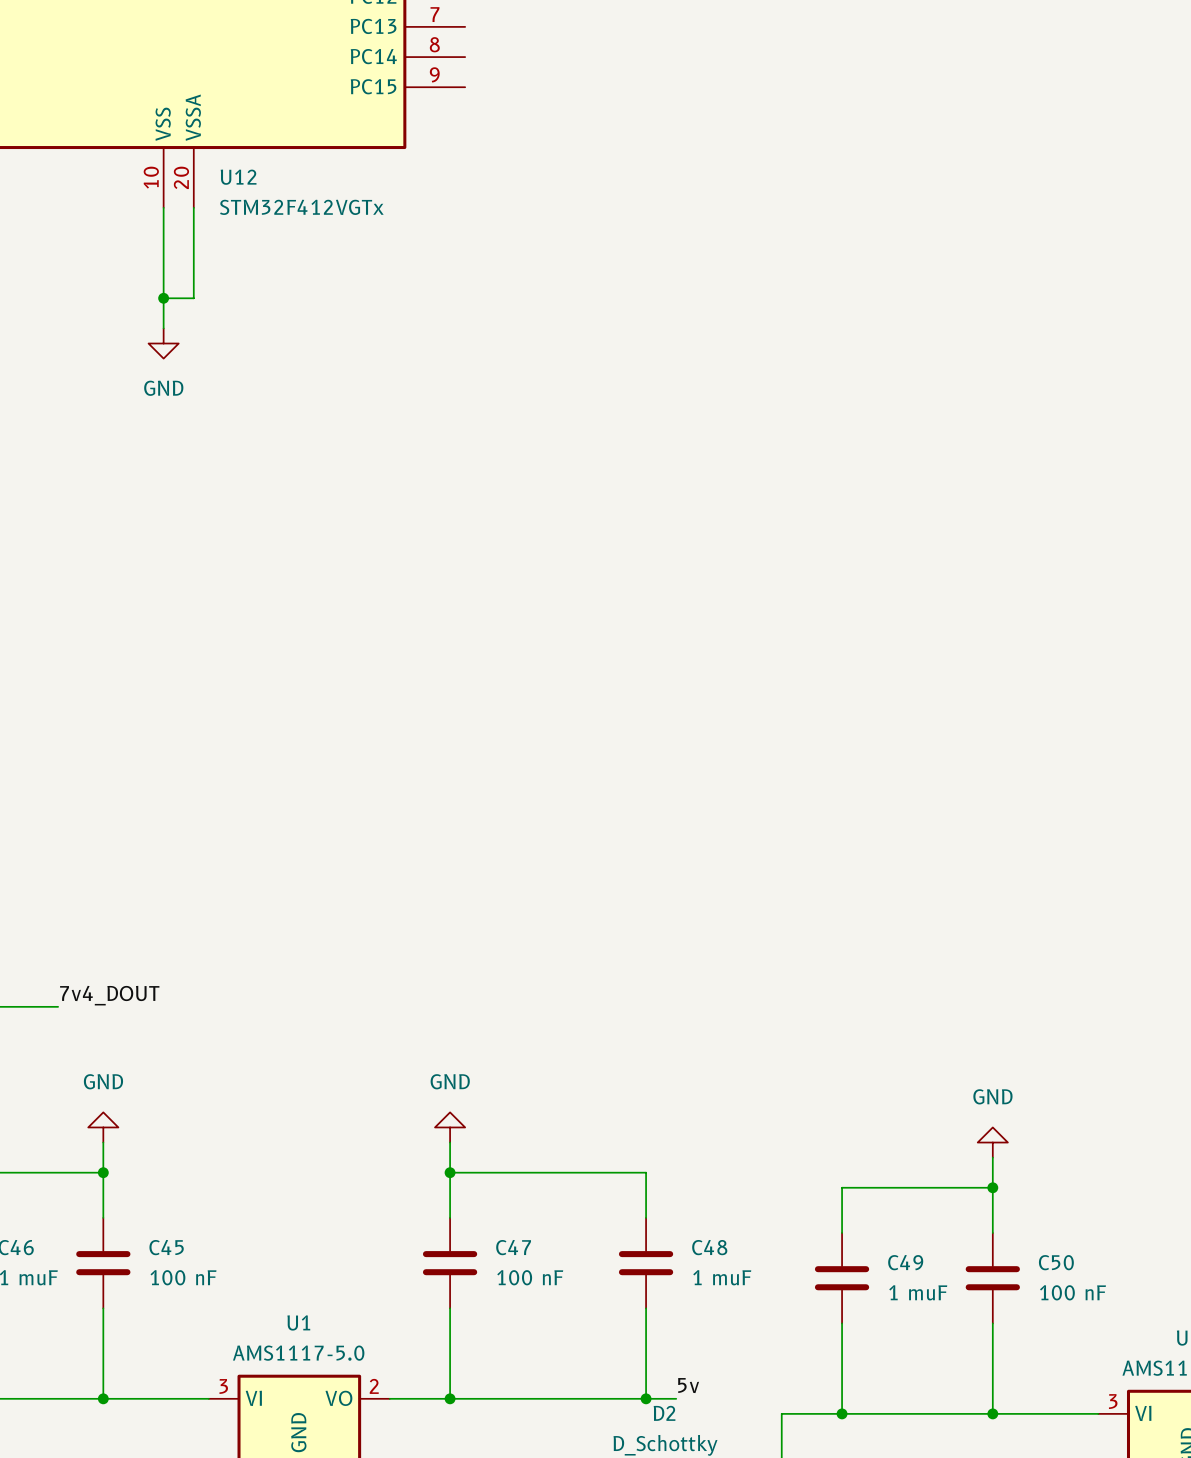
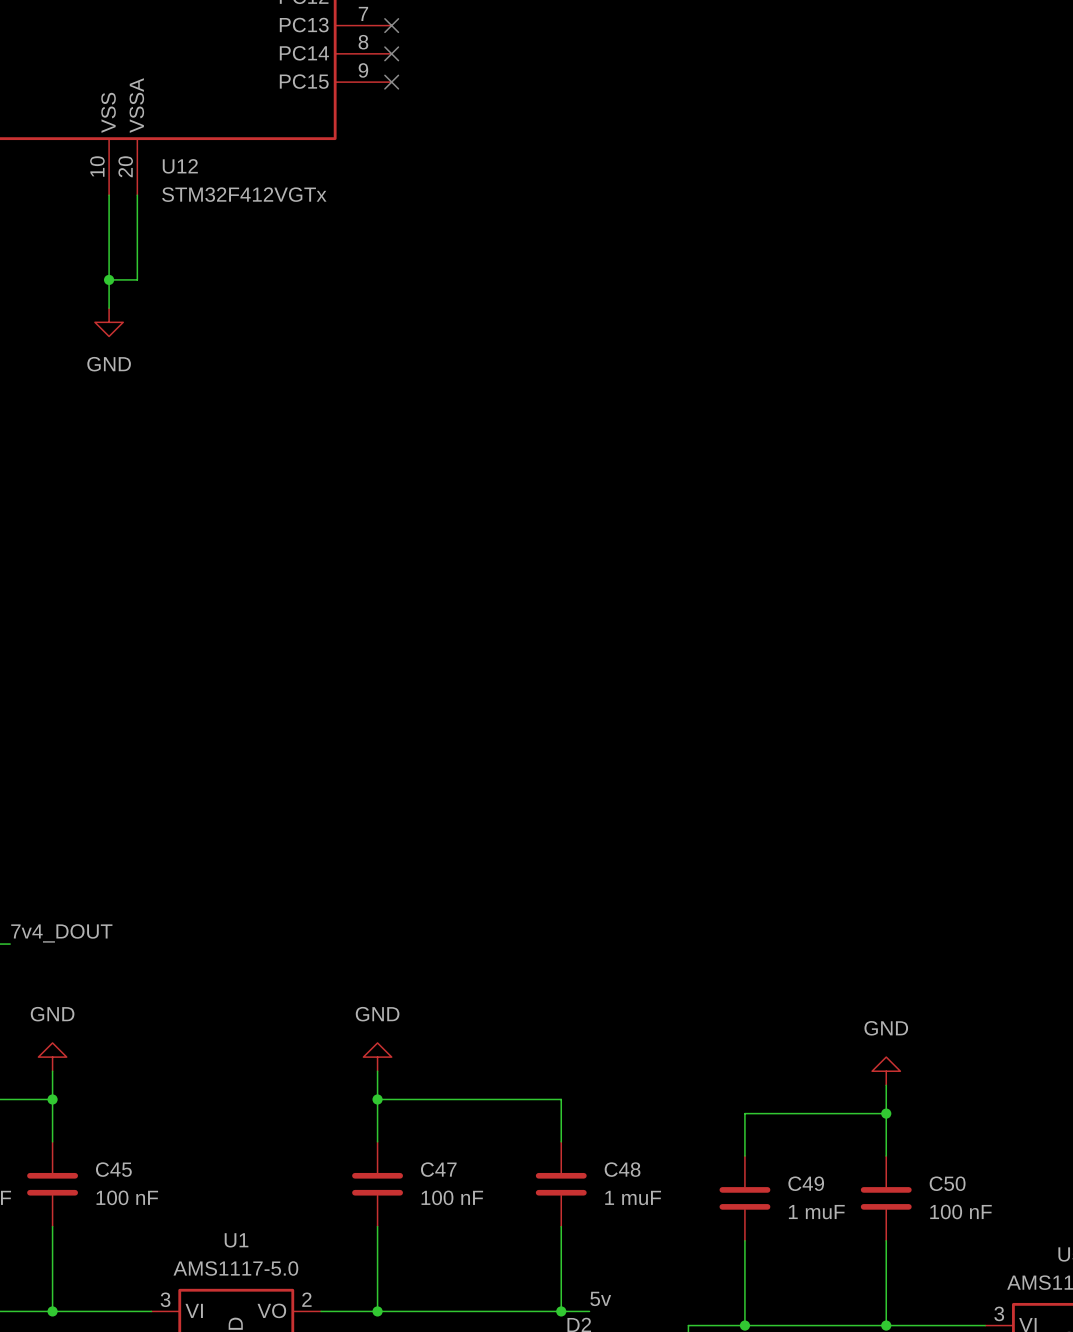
no-connect mark: none -> (391, 25)
no-connect mark: none -> (391, 53)
no-connect mark: none -> (391, 82)

